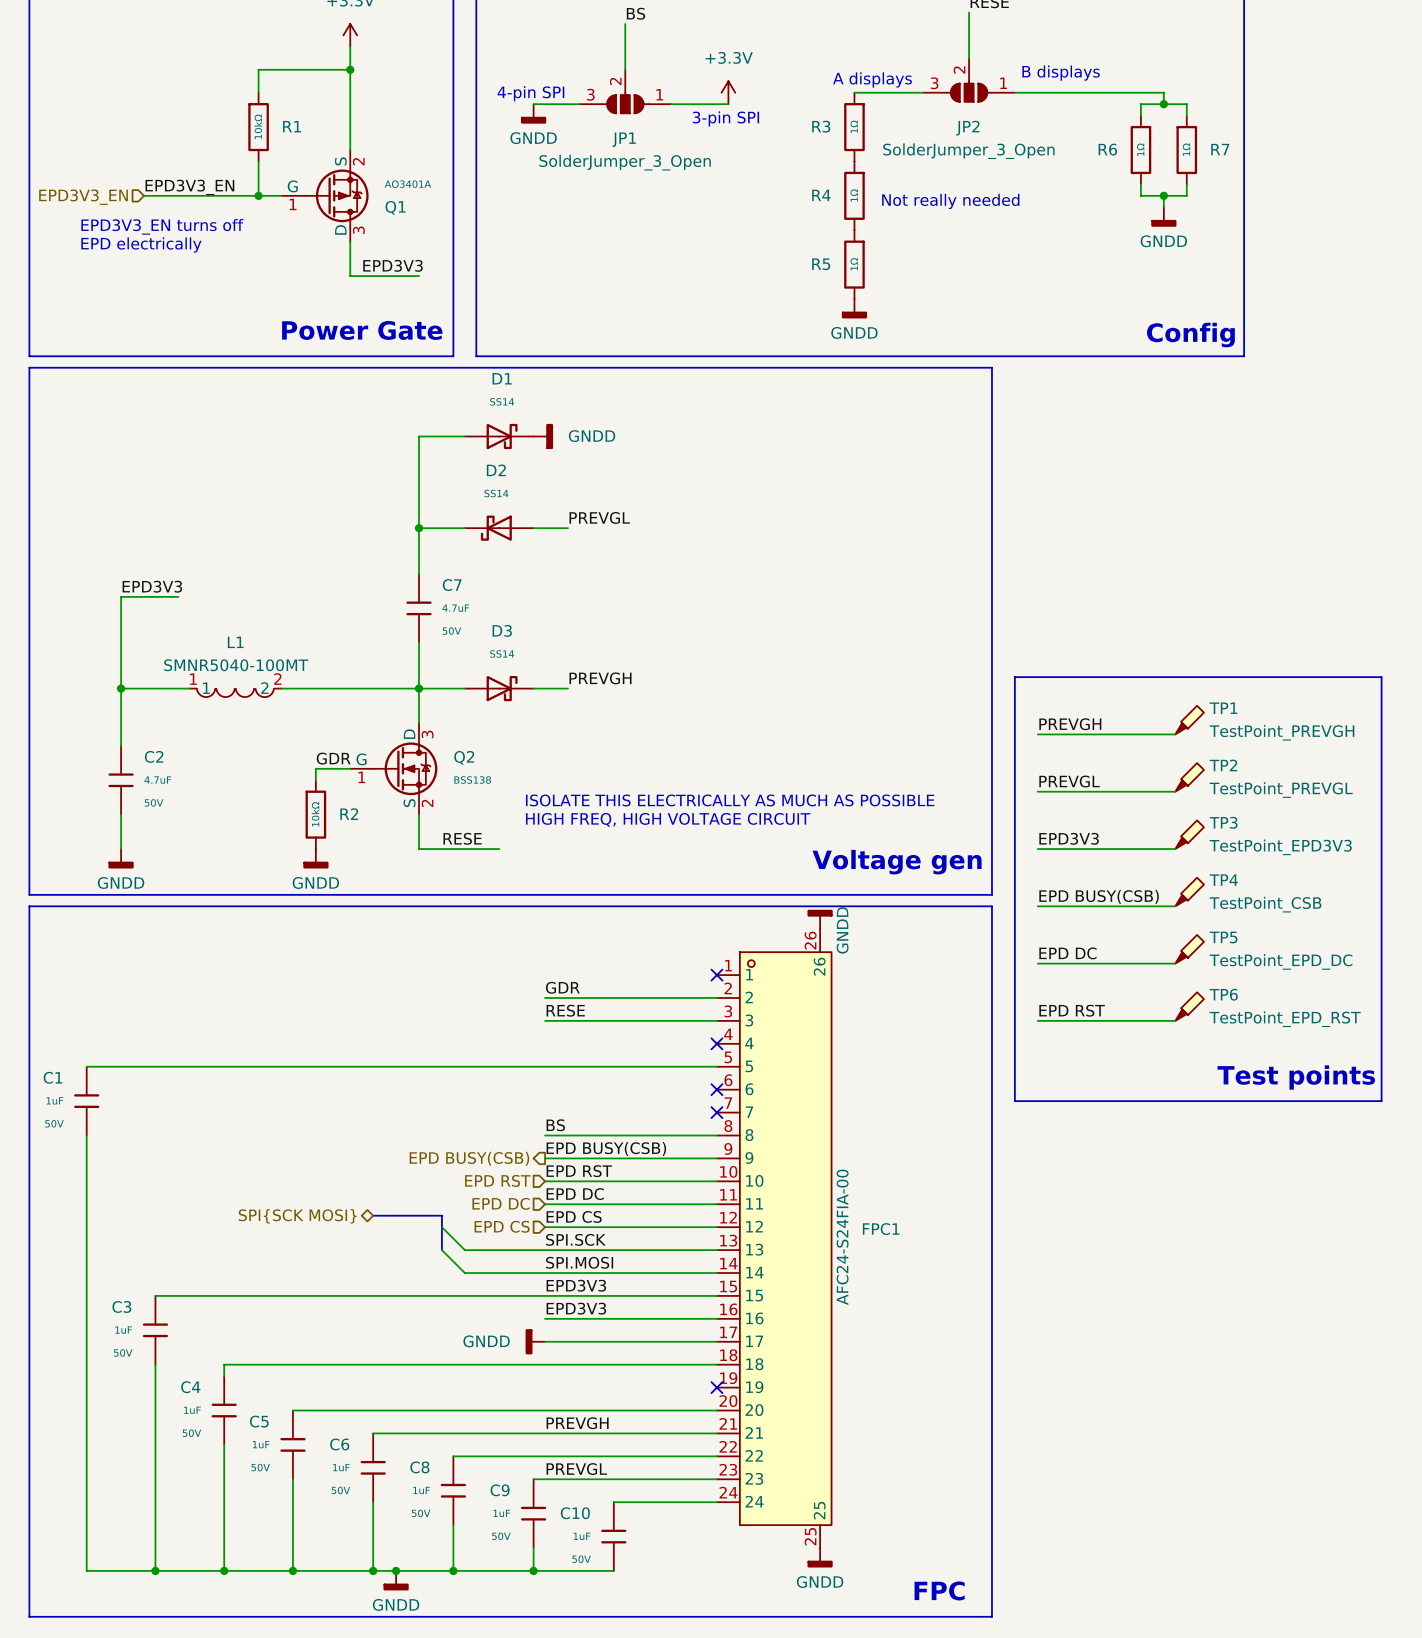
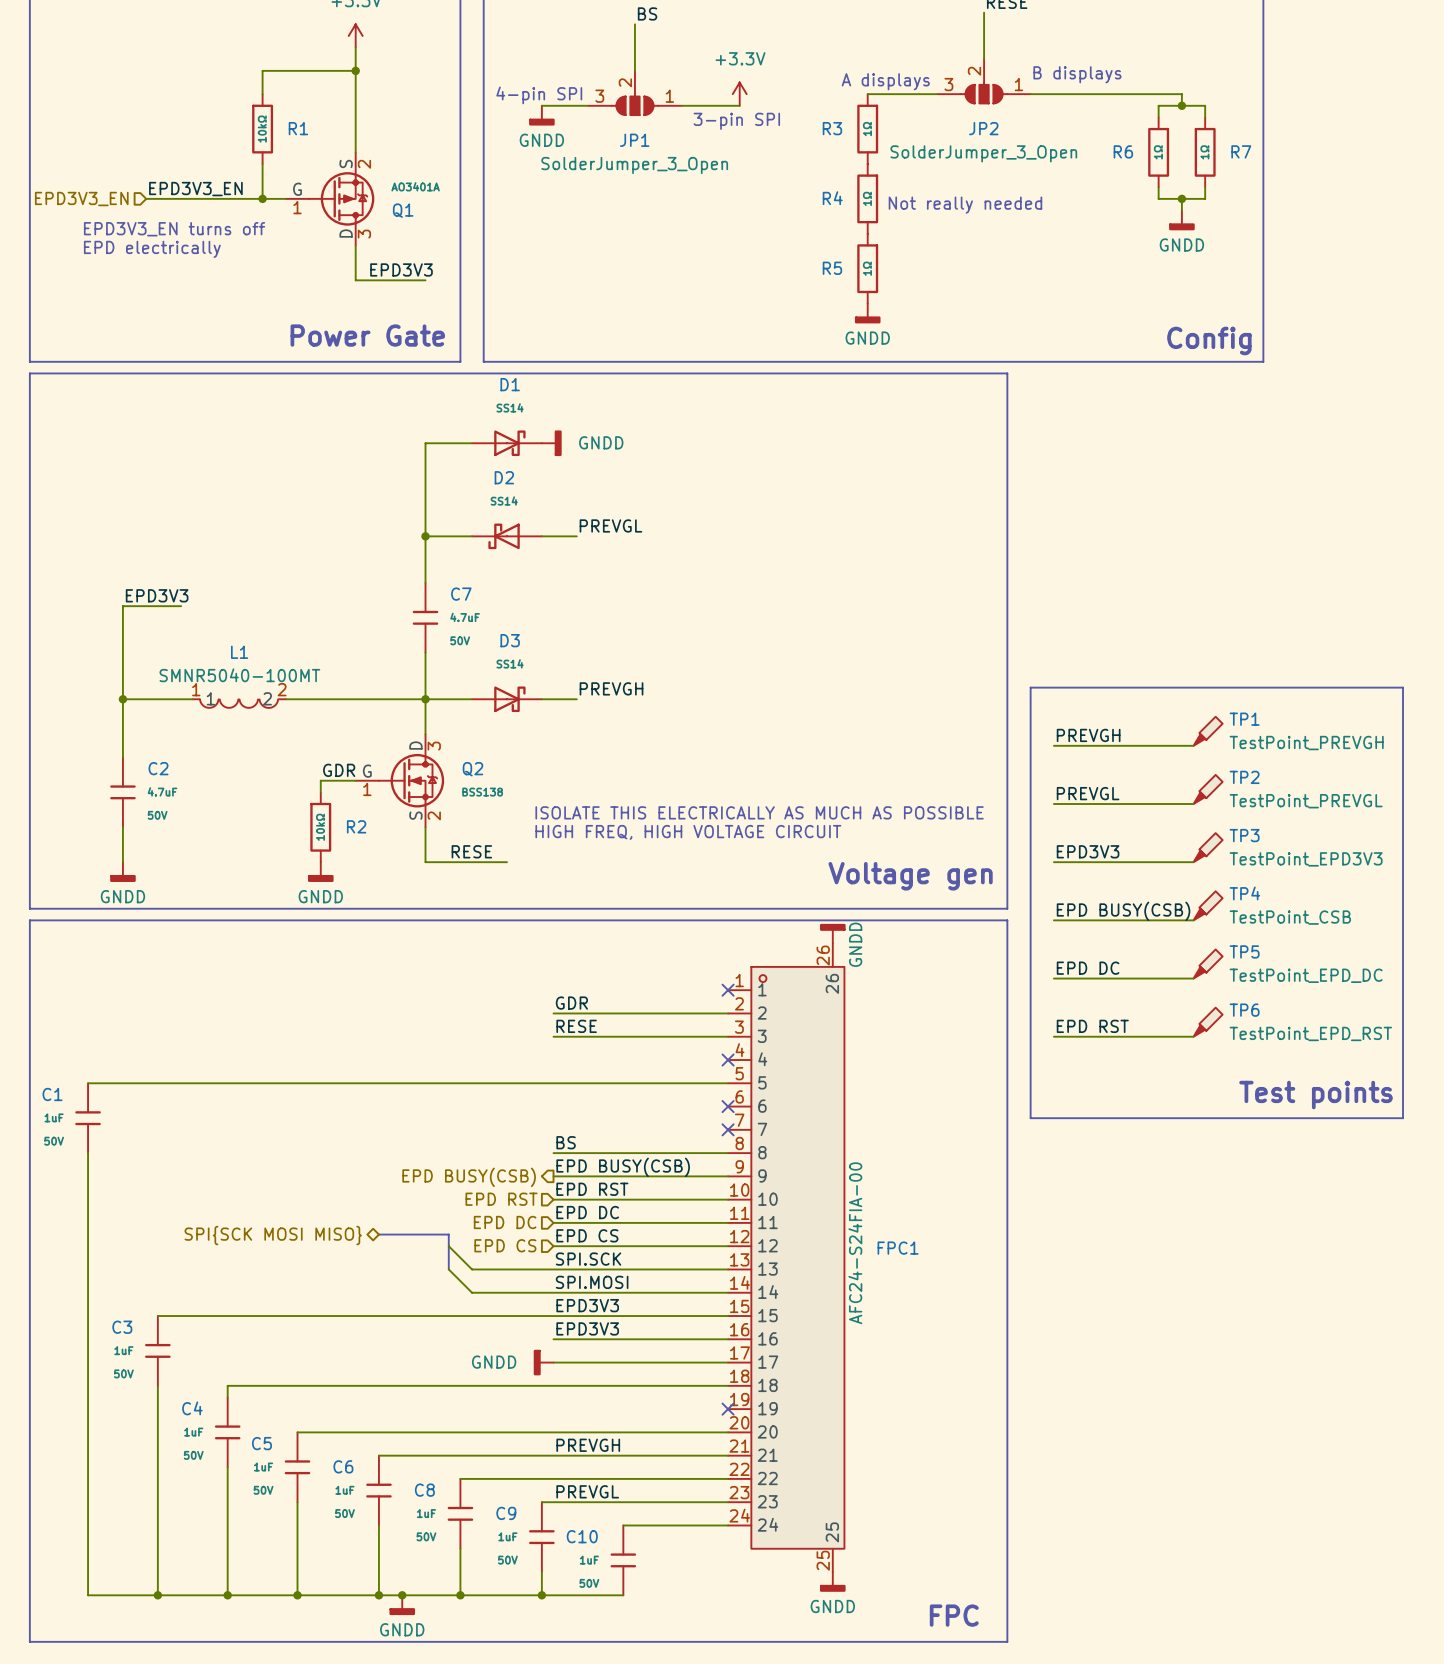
hierarchical label: SPI{SCK MOSI} (297, 1216) -> SPI{SCK MOSI MISO} (273, 1235)

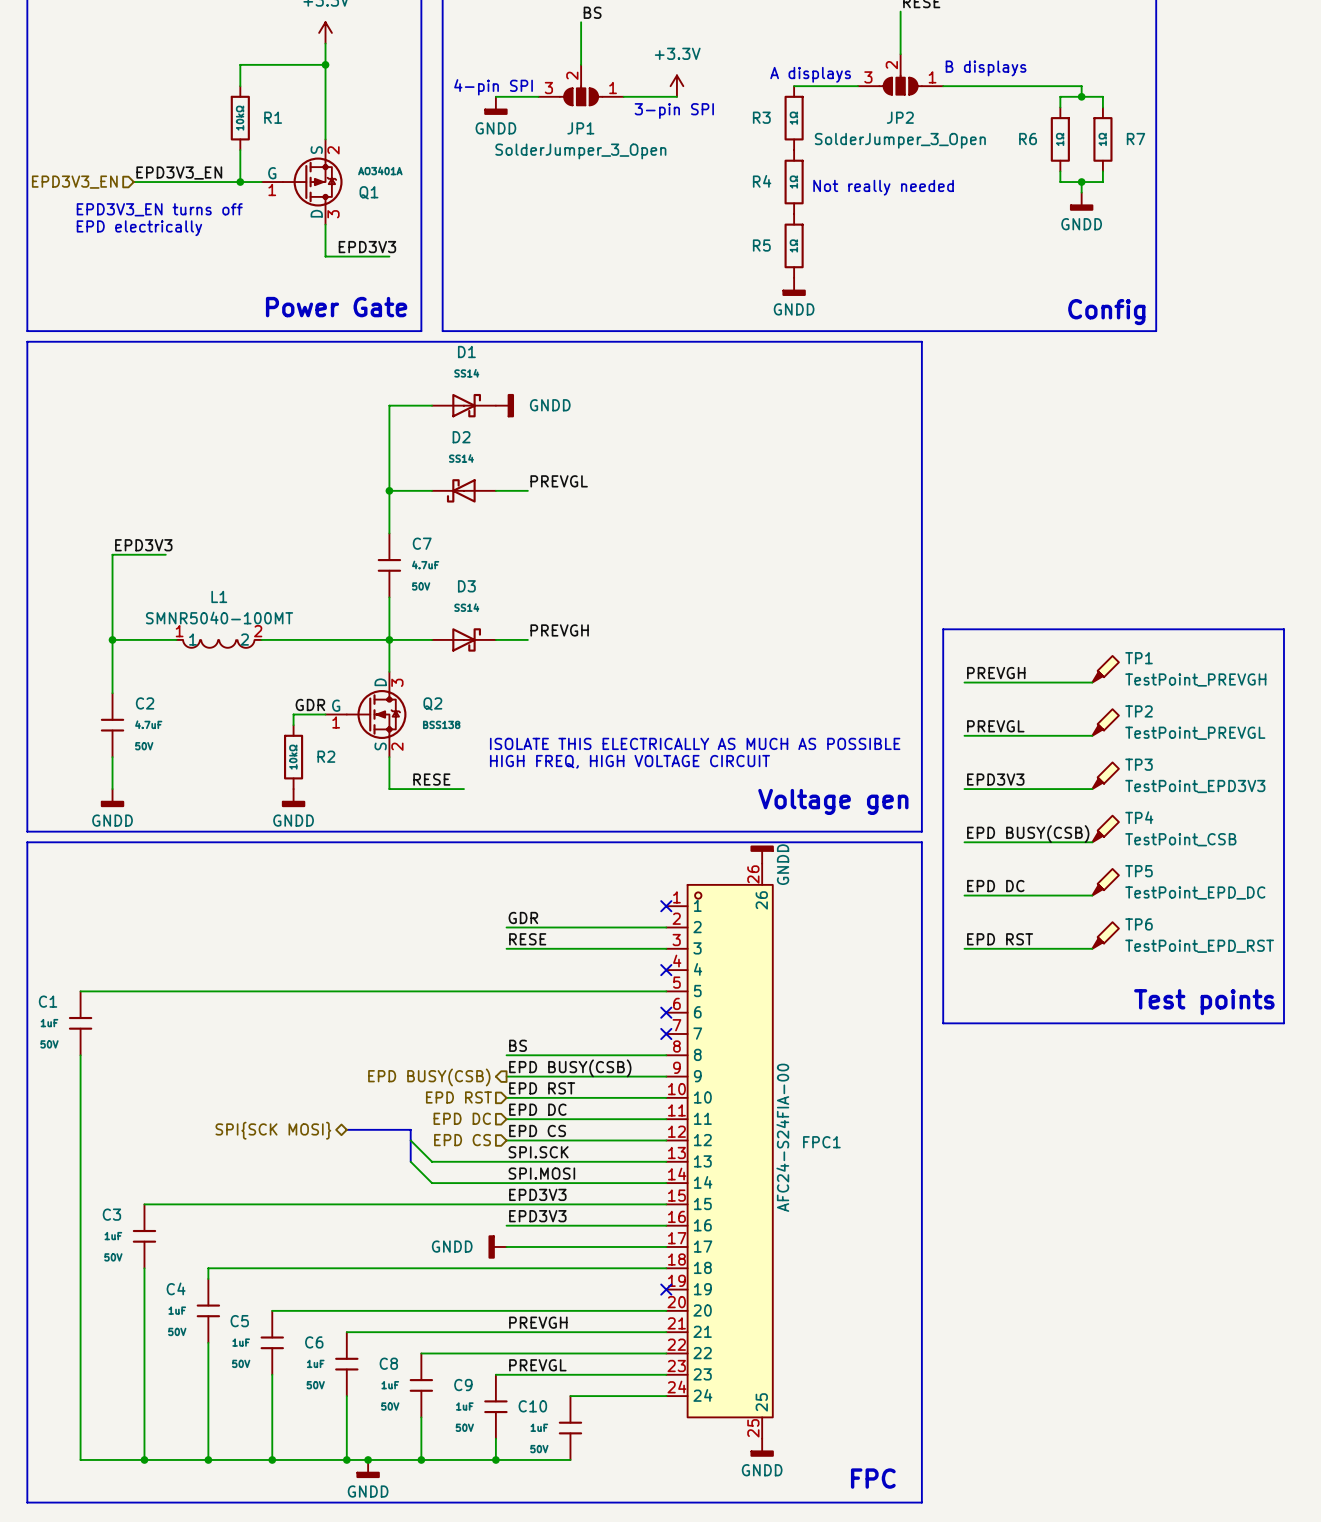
hierarchical label: SPI{SCK MOSI MISO} (273, 1235) -> SPI{SCK MOSI} (273, 1130)

